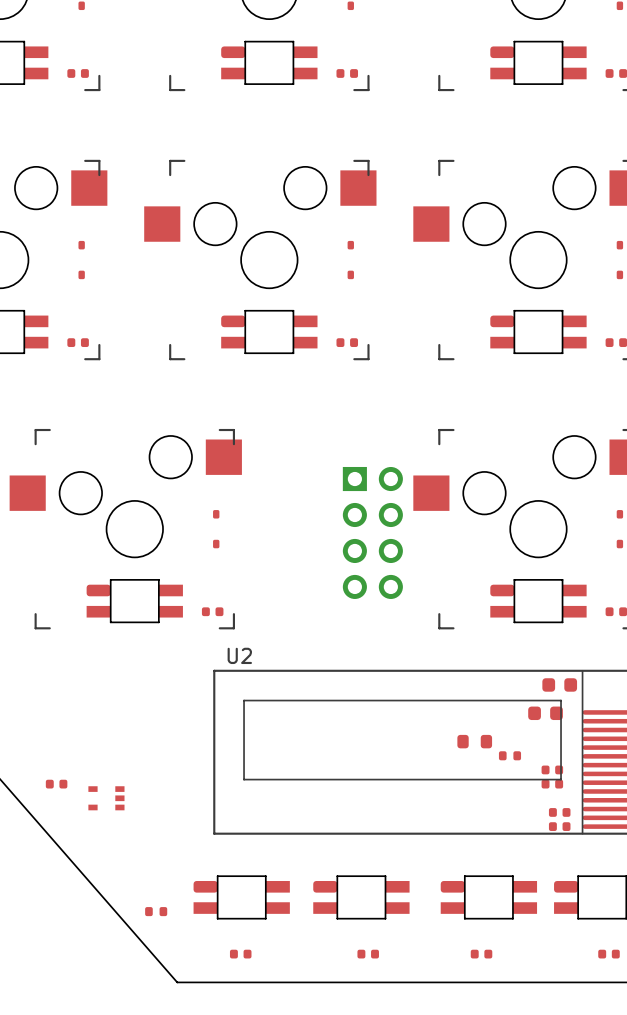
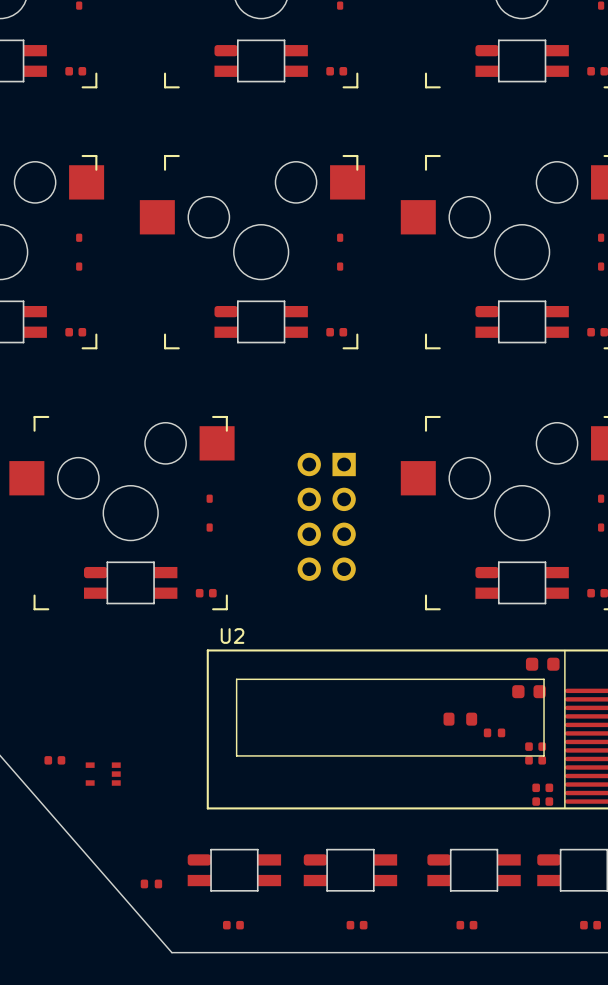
part: none -> (326, 516)
part: (372, 532) -> none

